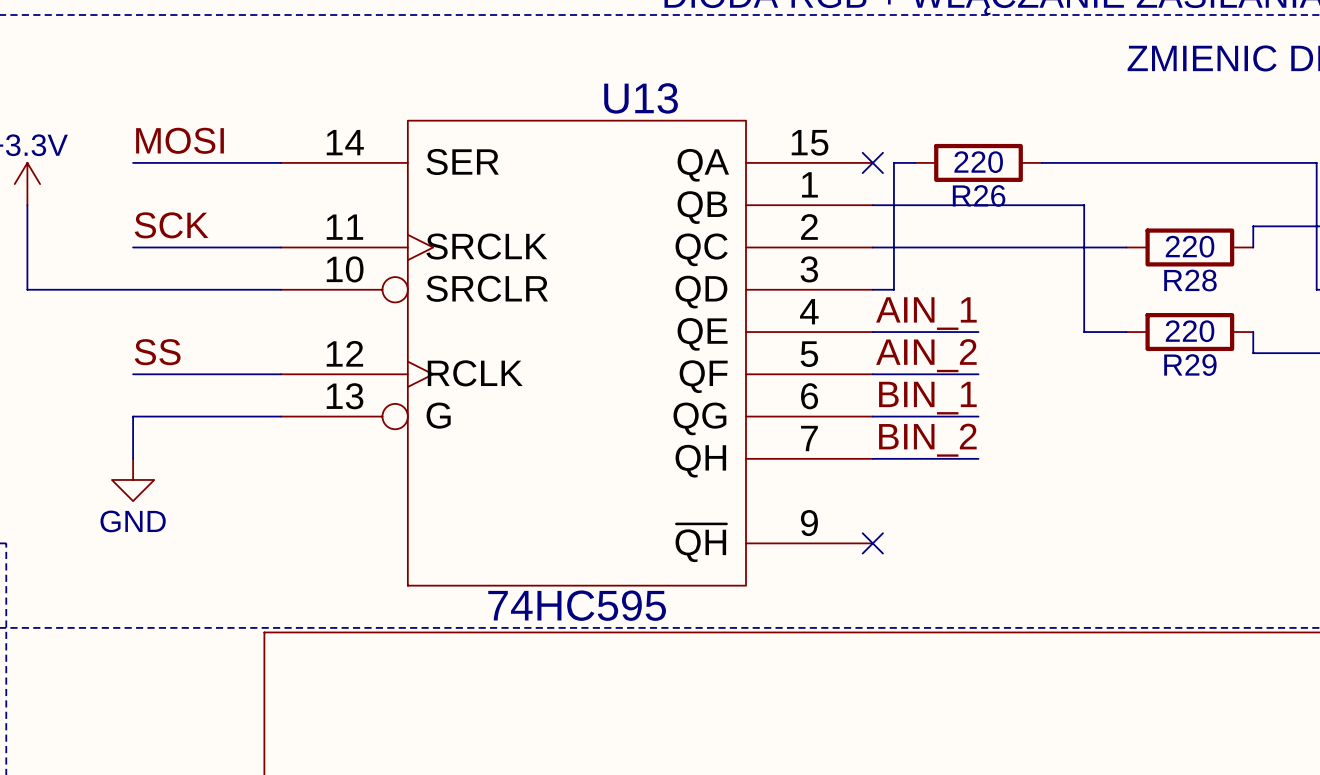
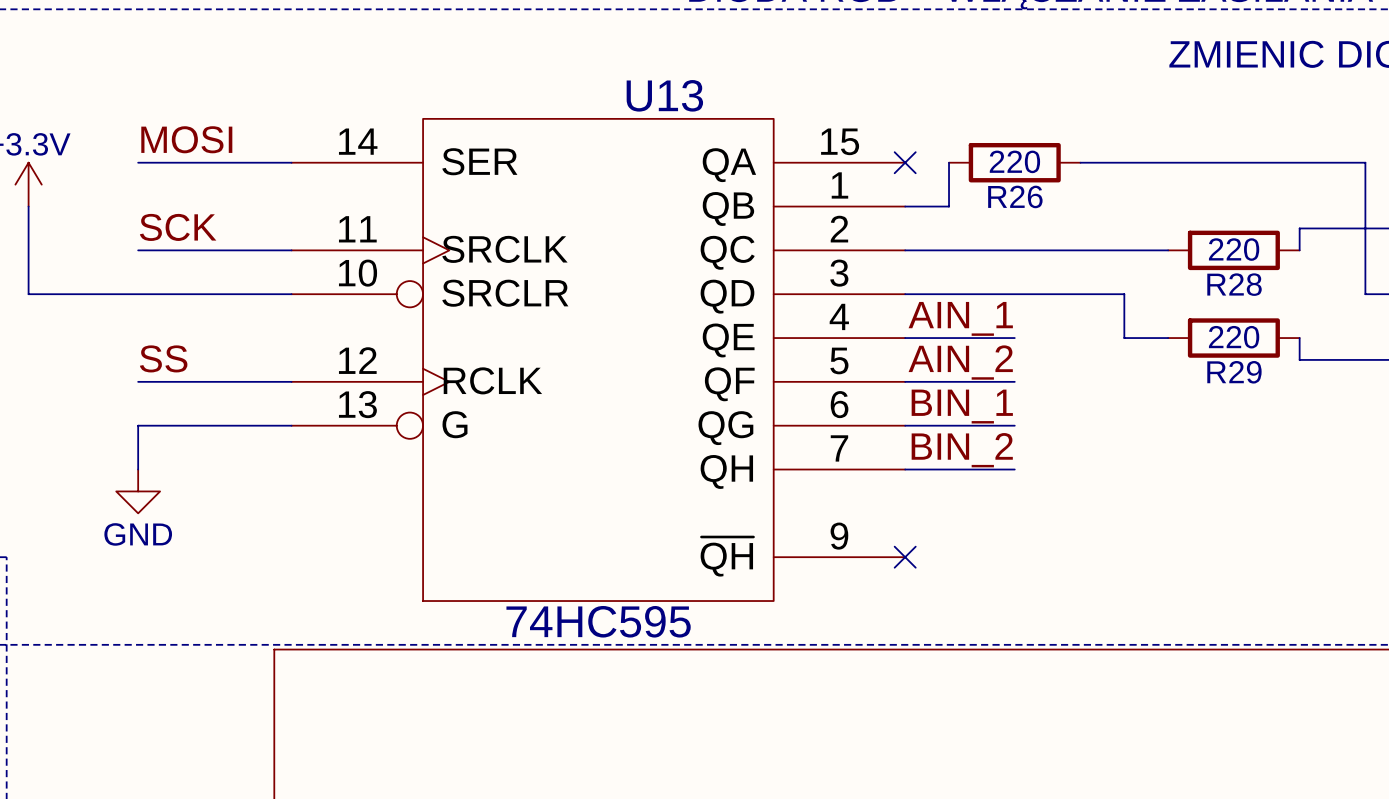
wire: (915, 162) (893, 162) (893, 289) -> (949, 162) (949, 206)
wire: (915, 205) (1084, 205) (1084, 289) -> (927, 294) (1124, 294)

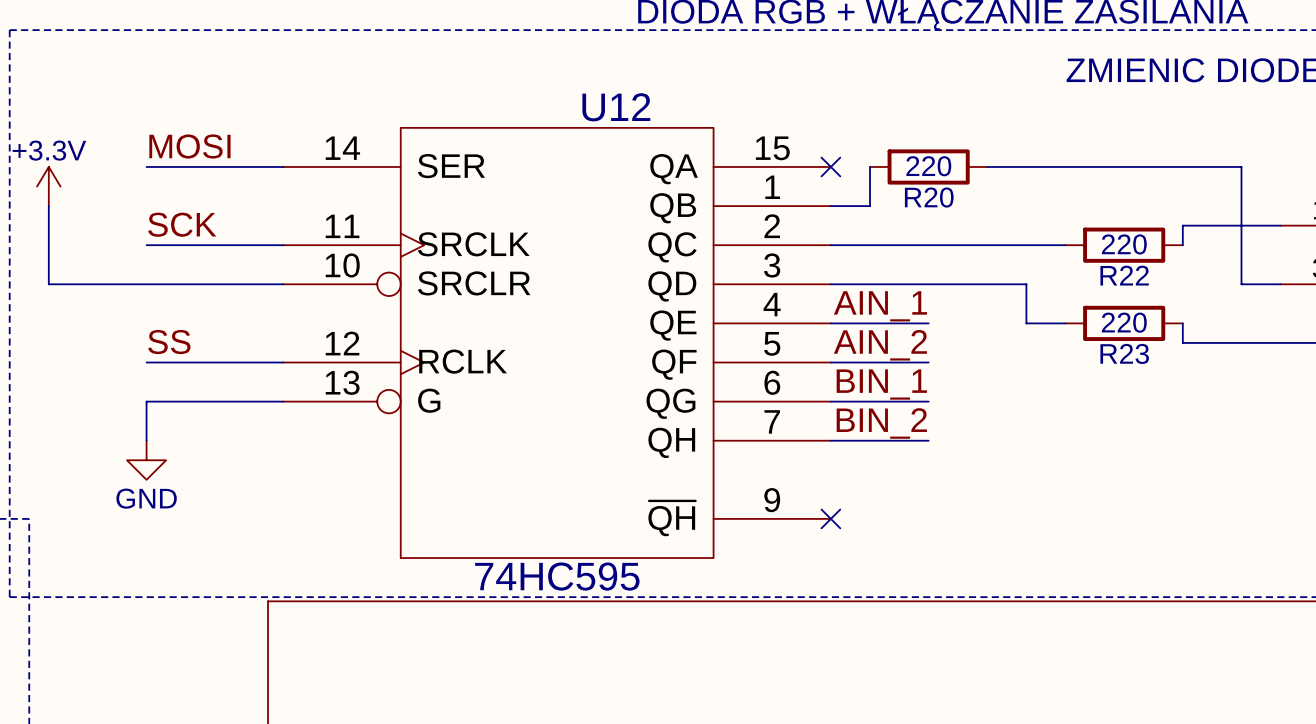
U13 name: U13 (664, 95) -> U12 (616, 107)
R26 name: R26 (1015, 196) -> R20 (929, 197)
R28 name: R28 (1234, 284) -> R22 (1124, 275)
R29 name: R29 (1234, 372) -> R23 (1124, 353)

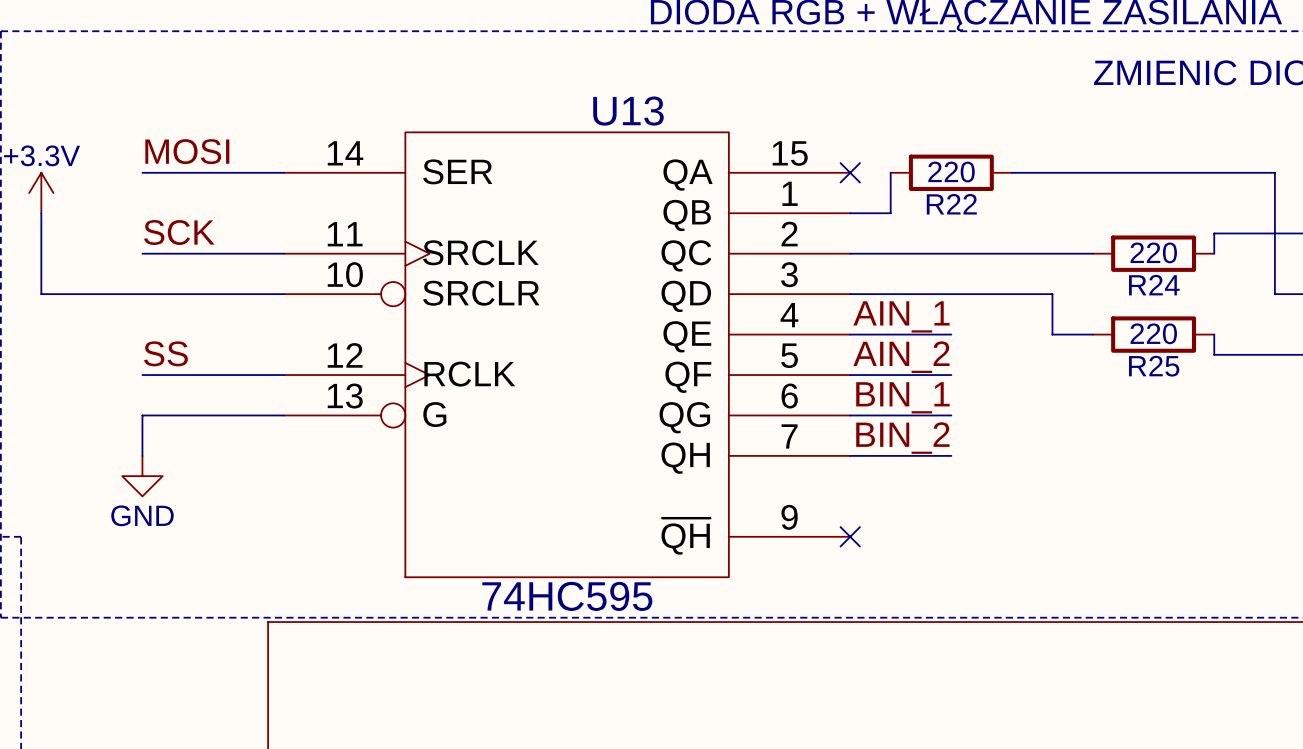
U12 name: U12 (616, 107) -> U13 (628, 111)
R20 name: R20 (929, 197) -> R22 (951, 204)
R22 name: R22 (1124, 275) -> R24 (1154, 285)
R23 name: R23 (1124, 353) -> R25 (1154, 366)

